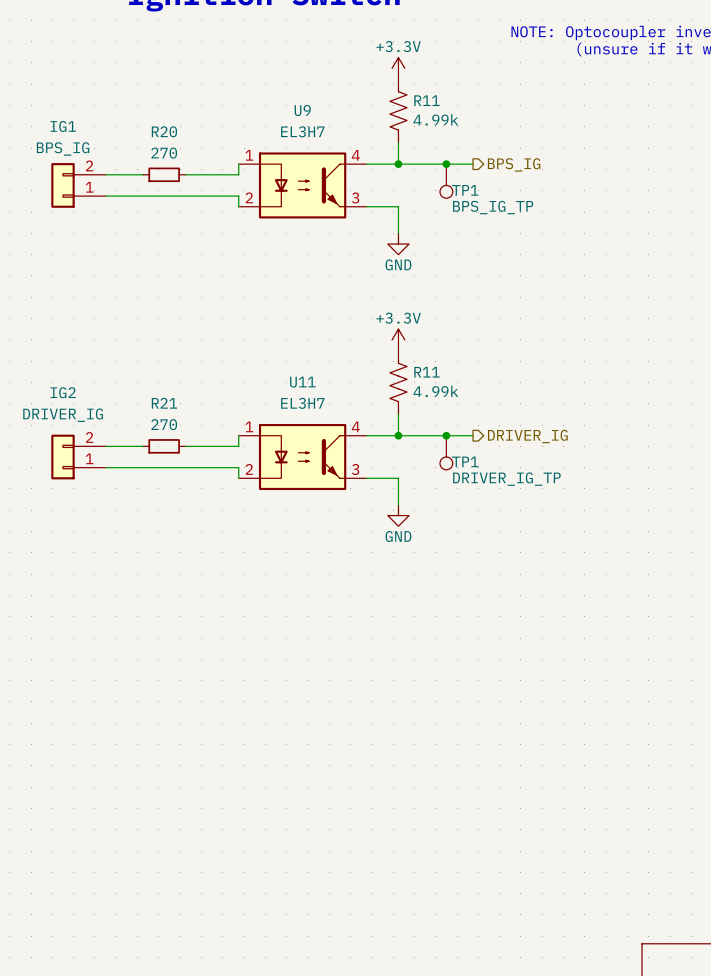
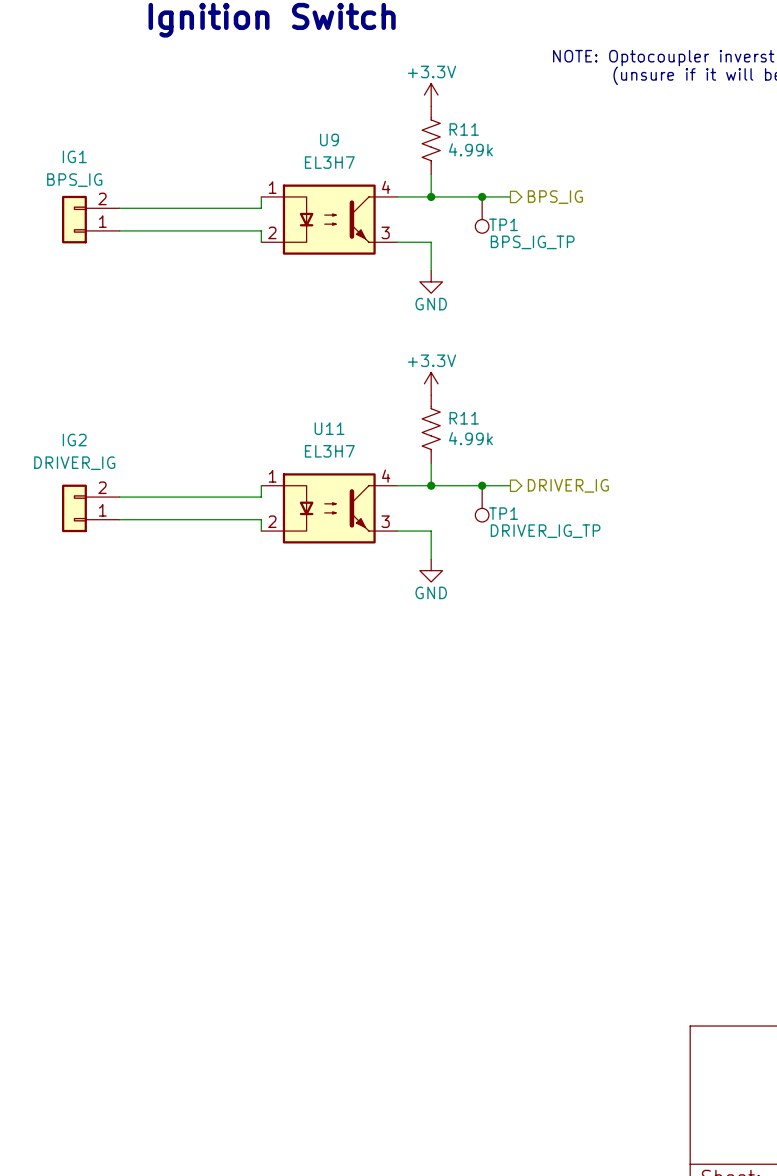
wire: none -> (159, 208) (204, 208)
R20: 270 (164, 174) -> none
wire: none -> (159, 497) (204, 497)
R21: 270 (164, 446) -> none

